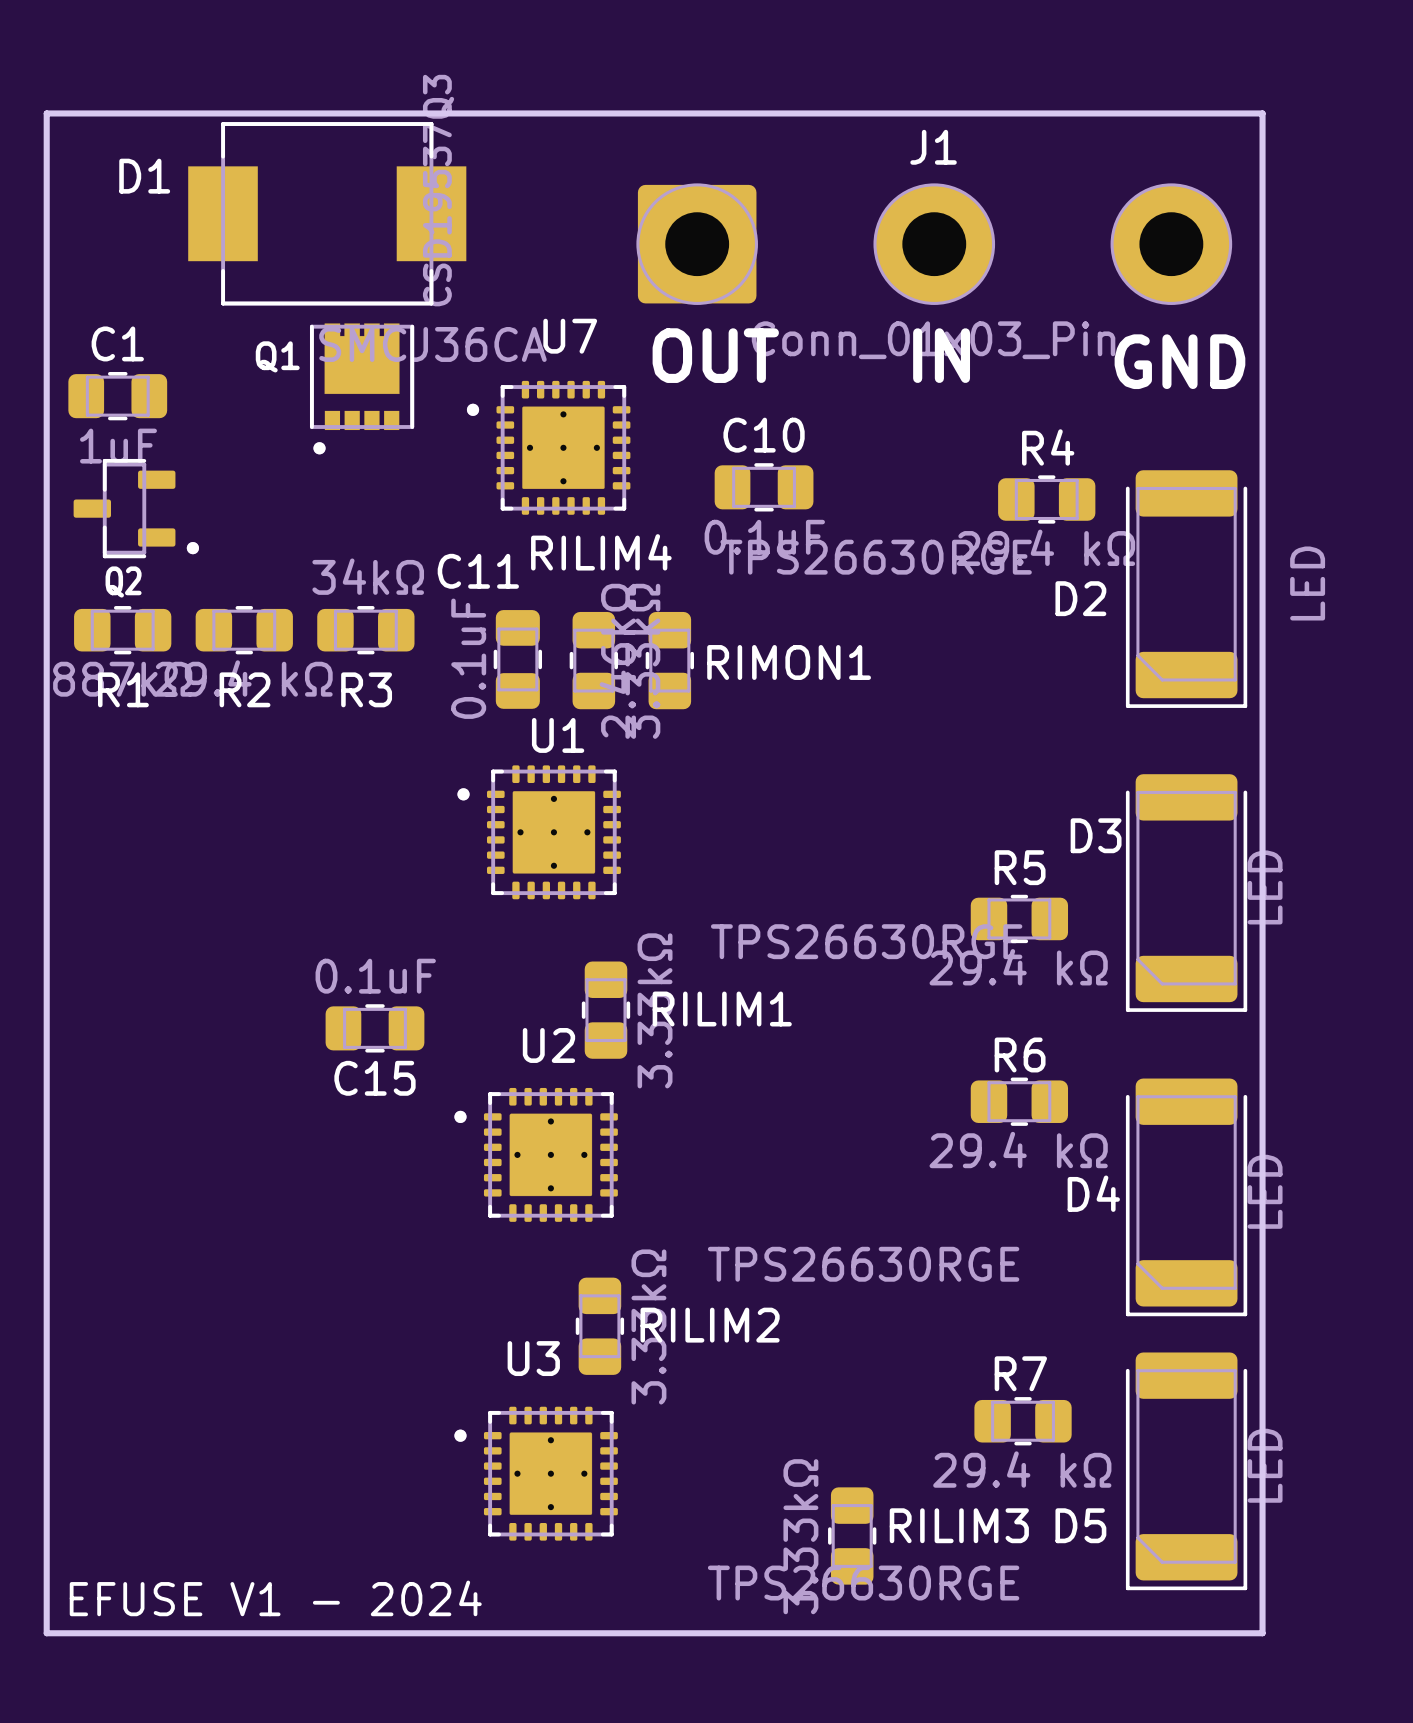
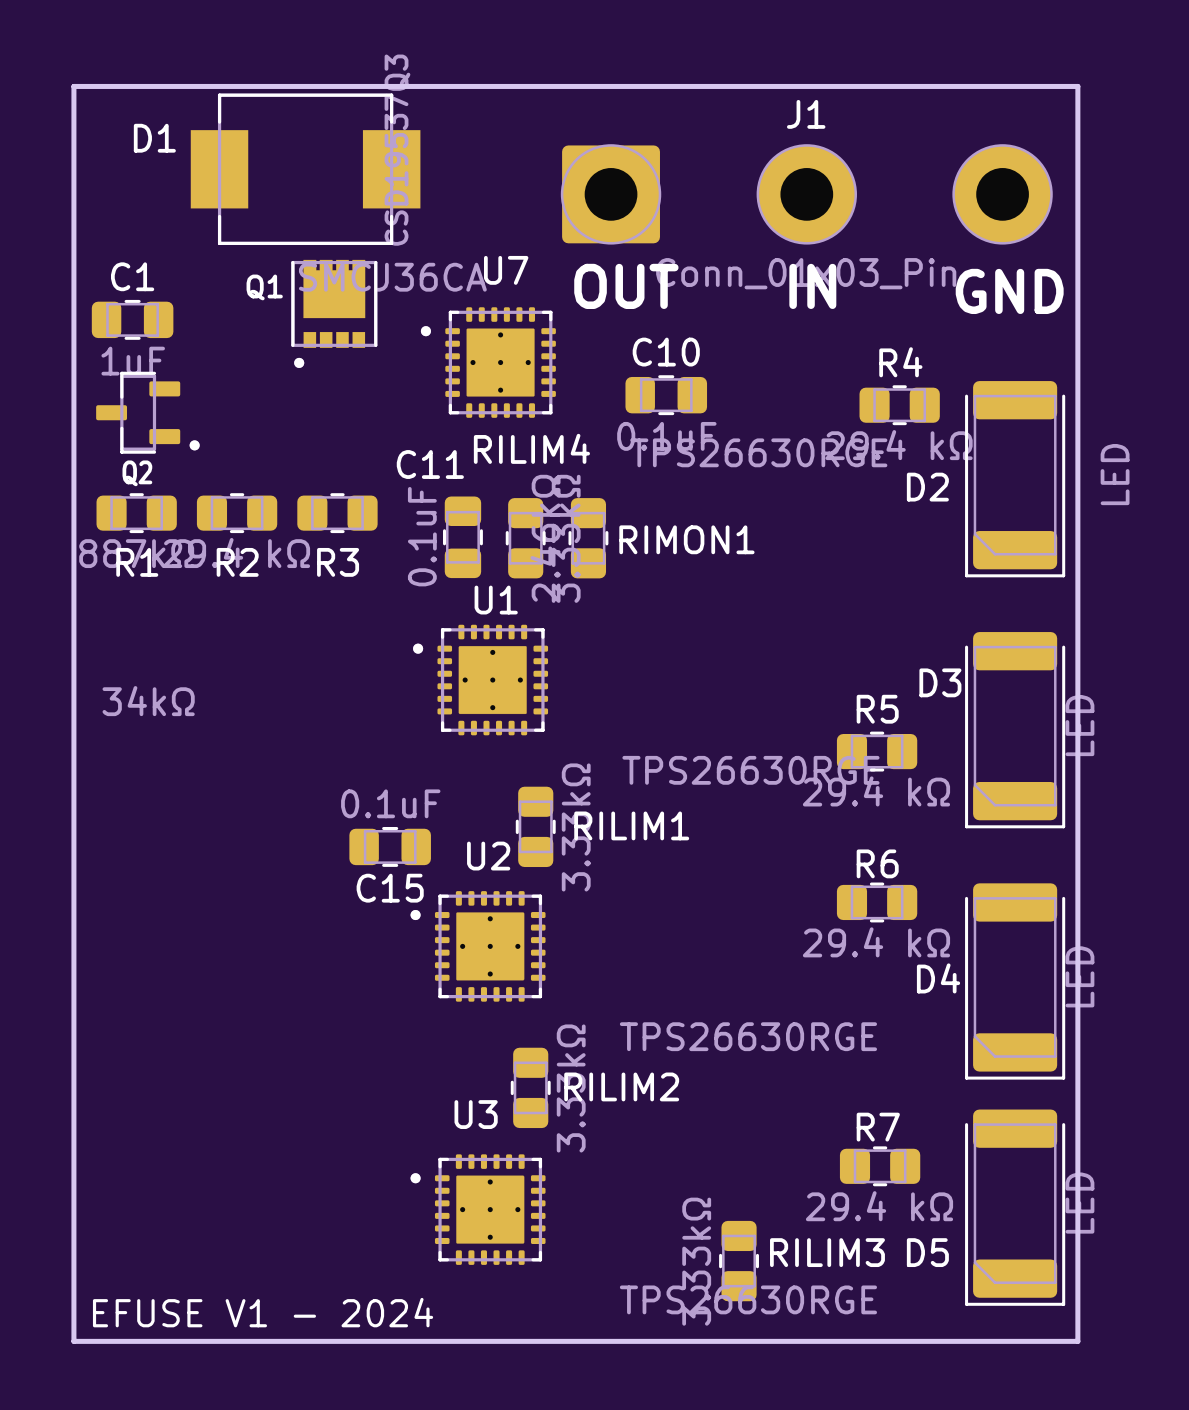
R3 value position: 34kΩ (368, 576) -> 34kΩ (148, 701)
C15 position: (374, 1028) -> (390, 846)

